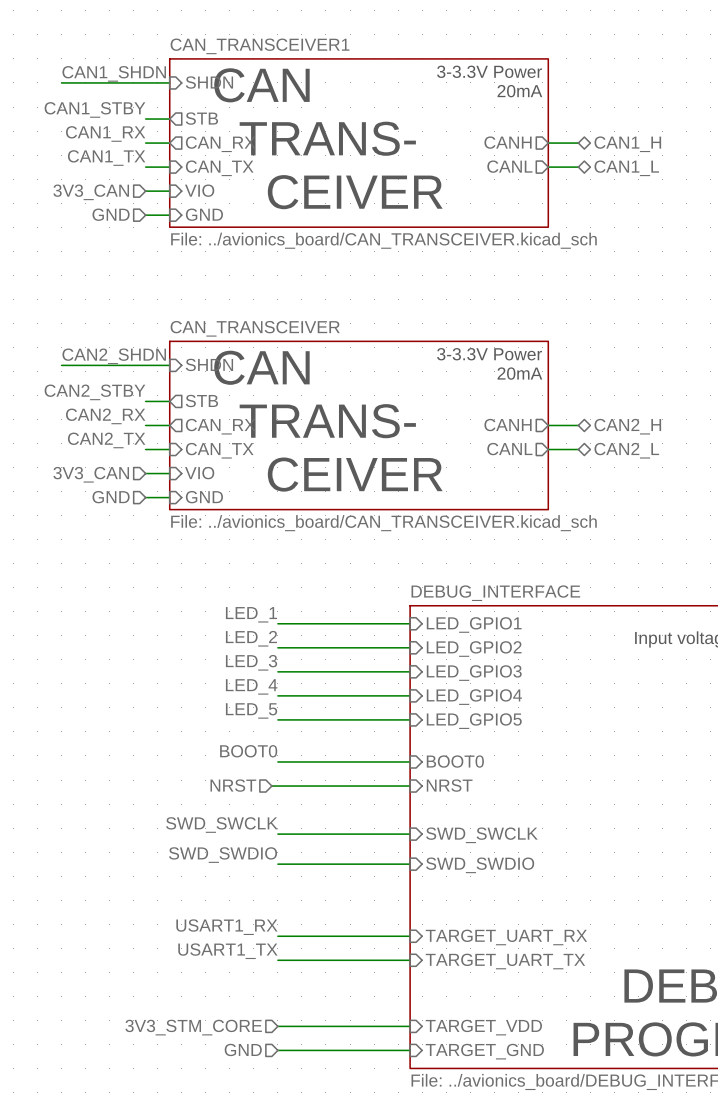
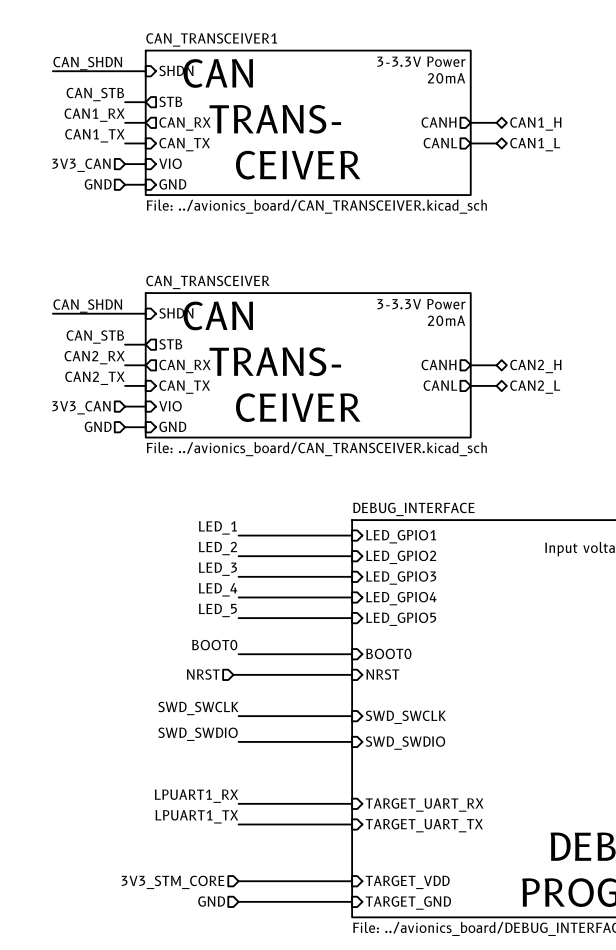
label: CAN1_SHDN (114, 73) -> CAN_SHDN (87, 63)
label: CAN1_STBY (94, 109) -> CAN_STB (95, 94)
label: CAN2_SHDN (114, 356) -> CAN_SHDN (87, 306)
label: CAN2_STBY (94, 392) -> CAN_STB (95, 337)
label: USART1_RX (226, 927) -> LPUART1_RX (196, 796)
label: USART1_TX (227, 951) -> LPUART1_TX (196, 816)

